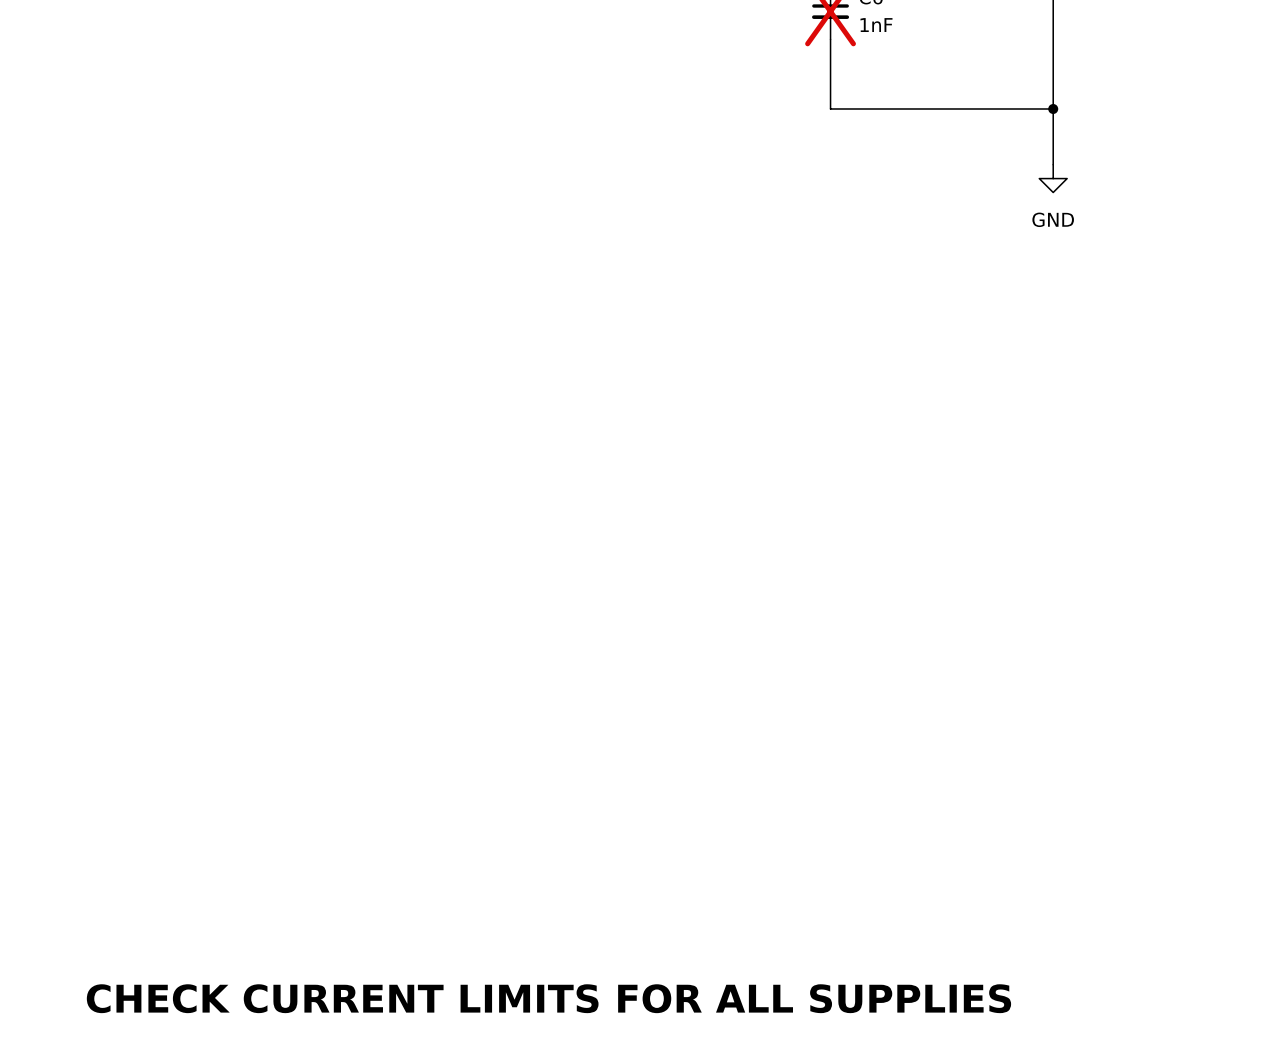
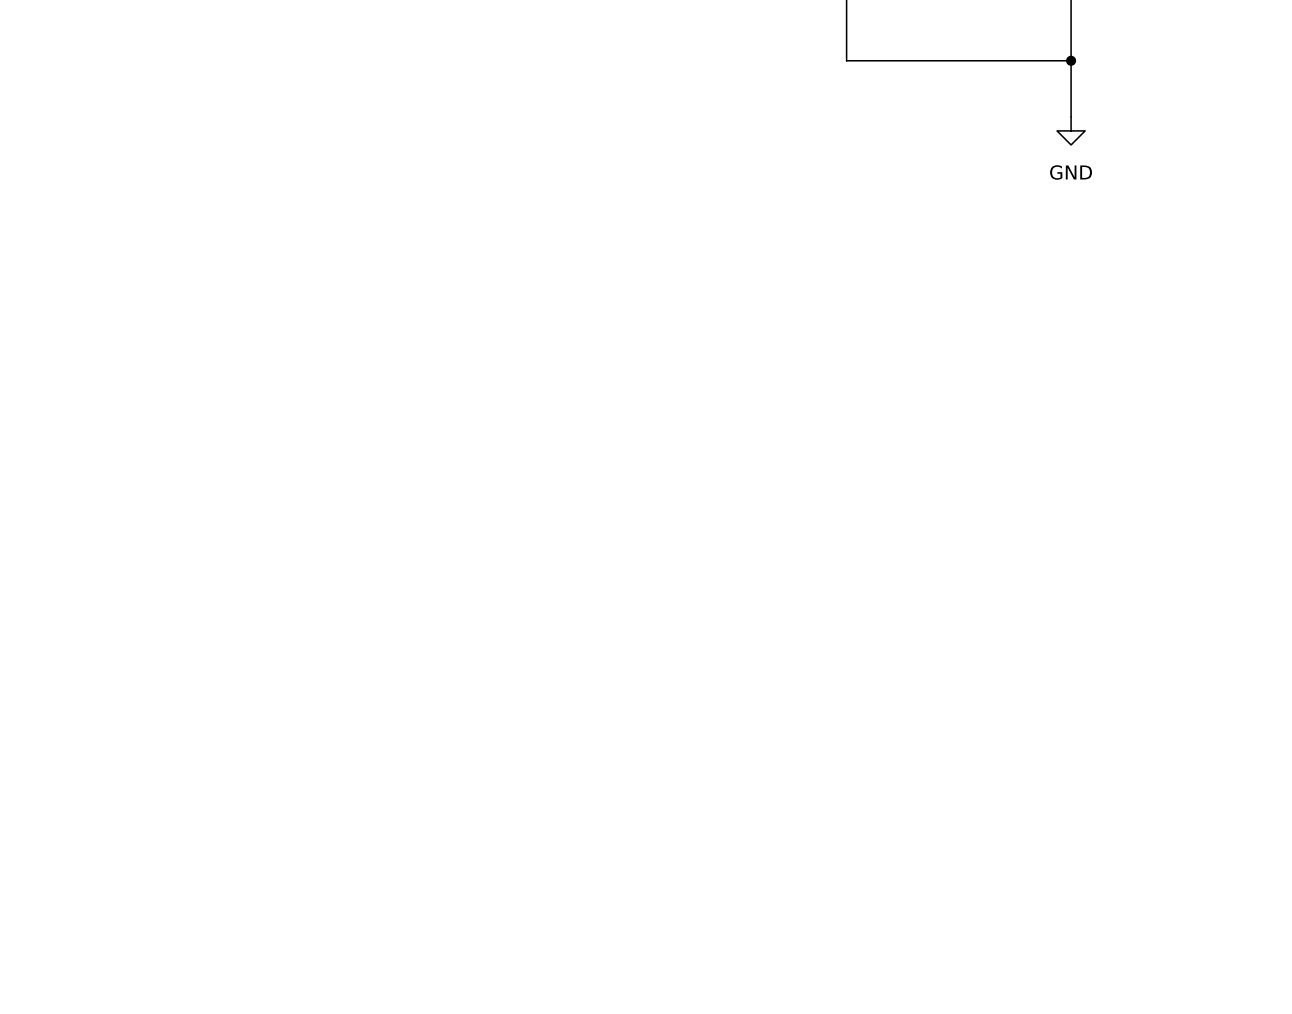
text: CHECK CURRENT LIMITS FOR ALL SUPPLIES (548, 998) -> none

